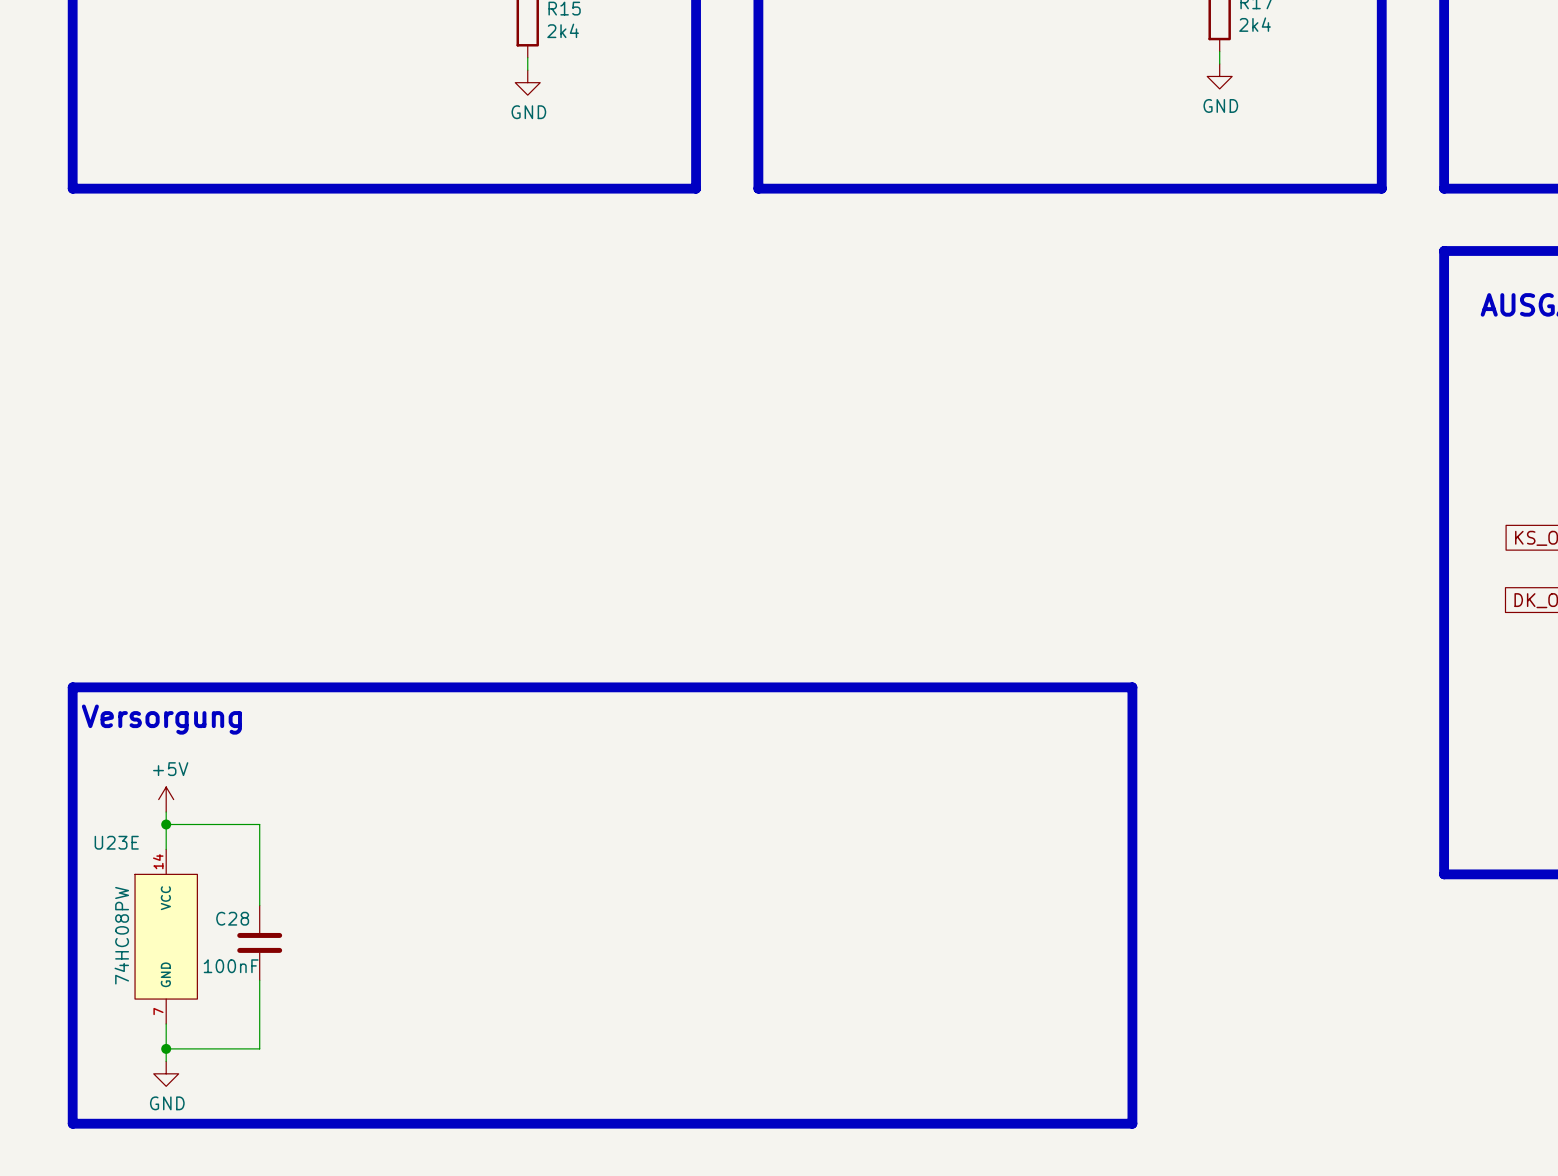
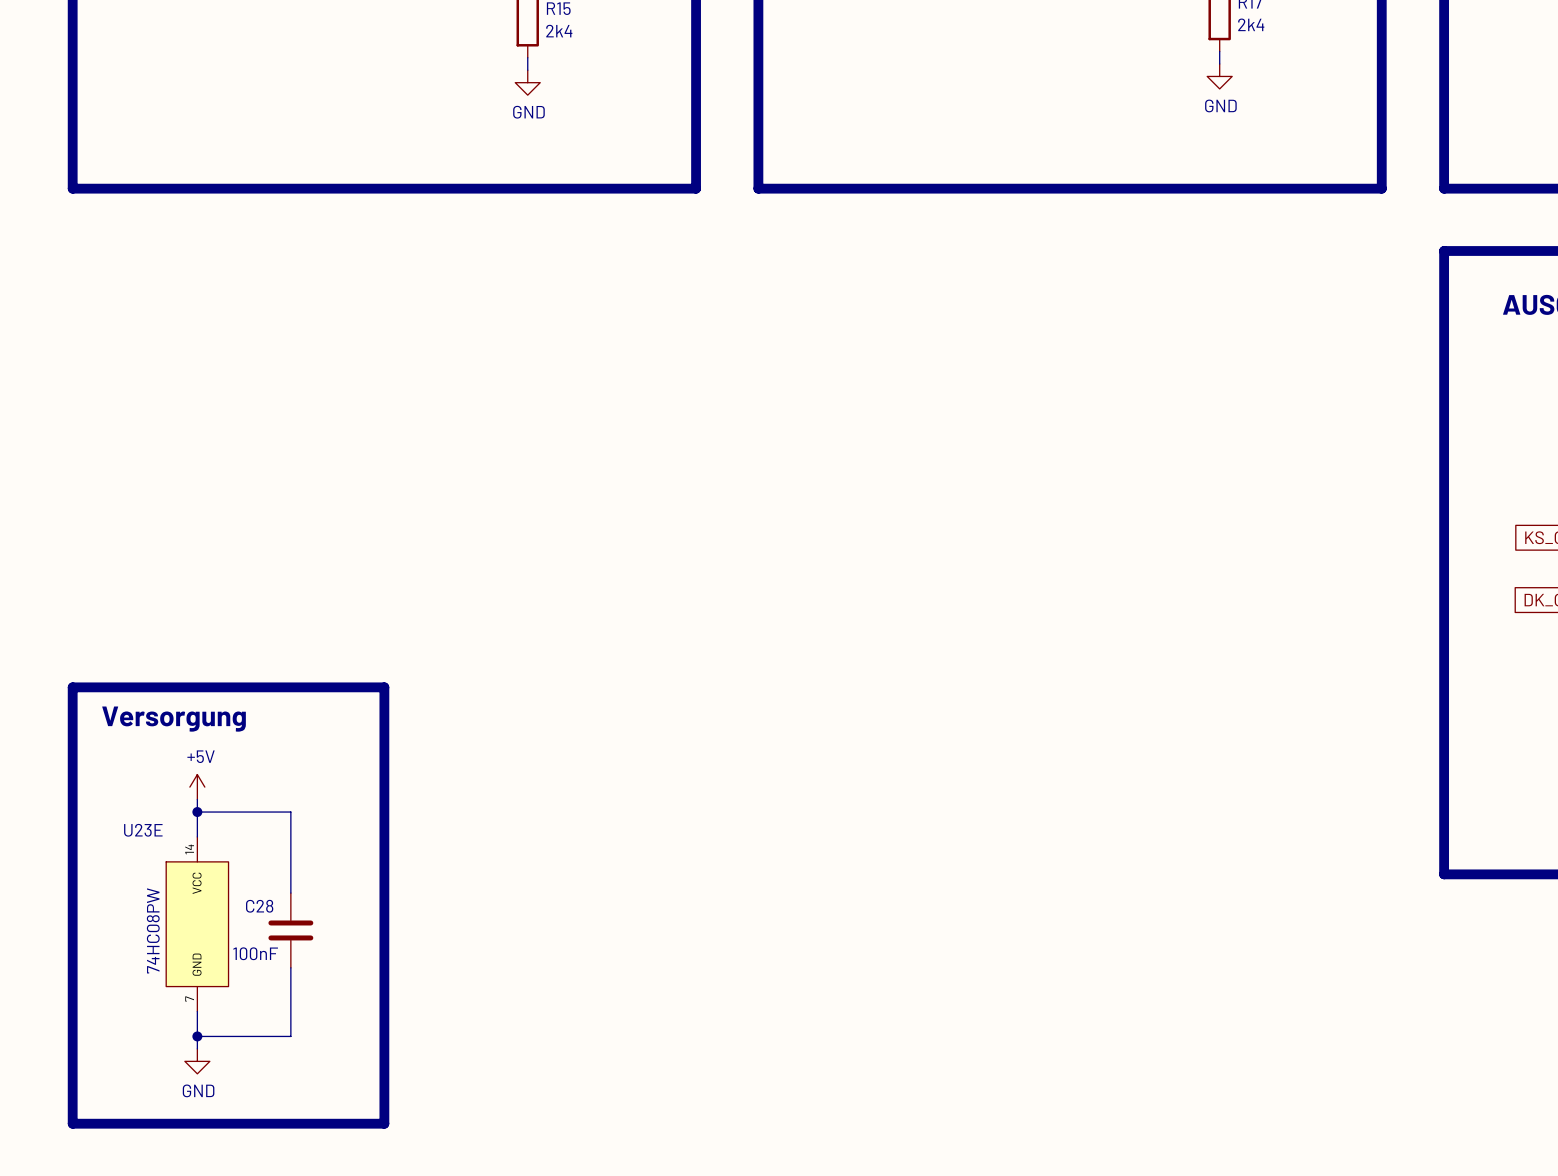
line: (384, 687) (1132, 687) (1132, 1123) (384, 1123) -> (384, 687) (384, 1123)
power symbol position: +5V (166, 799) -> +5V (197, 787)
wire: (166, 812) (166, 849) -> (197, 799) (197, 836)
wire: (166, 824) (259, 824) (259, 905) -> (197, 812) (290, 812) (290, 893)
junction position: (166, 824) -> (197, 812)
U23E position: (166, 936) -> (197, 924)
C28 position: (259, 942) -> (290, 930)
wire: (259, 980) (259, 1048) (166, 1048) -> (290, 967) (290, 1036) (197, 1036)
wire: (166, 1023) (166, 1061) -> (197, 1011) (197, 1048)
junction position: (166, 1048) -> (197, 1036)
power symbol position: GND (166, 1073) -> GND (197, 1061)

